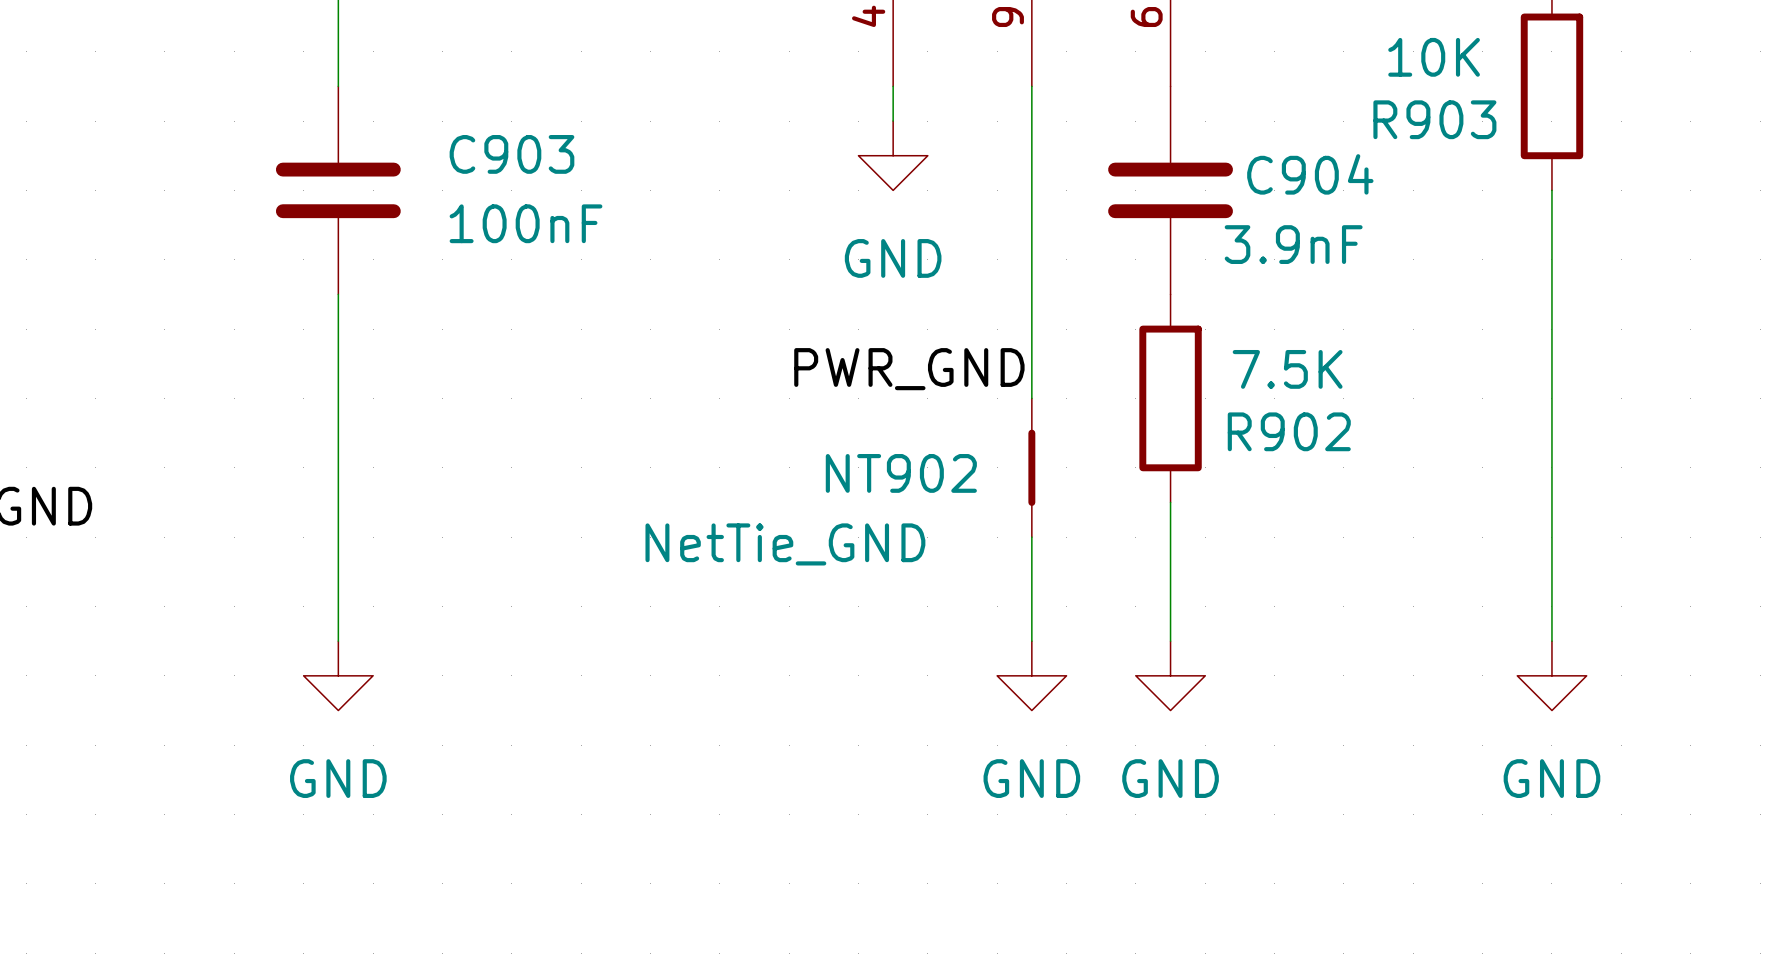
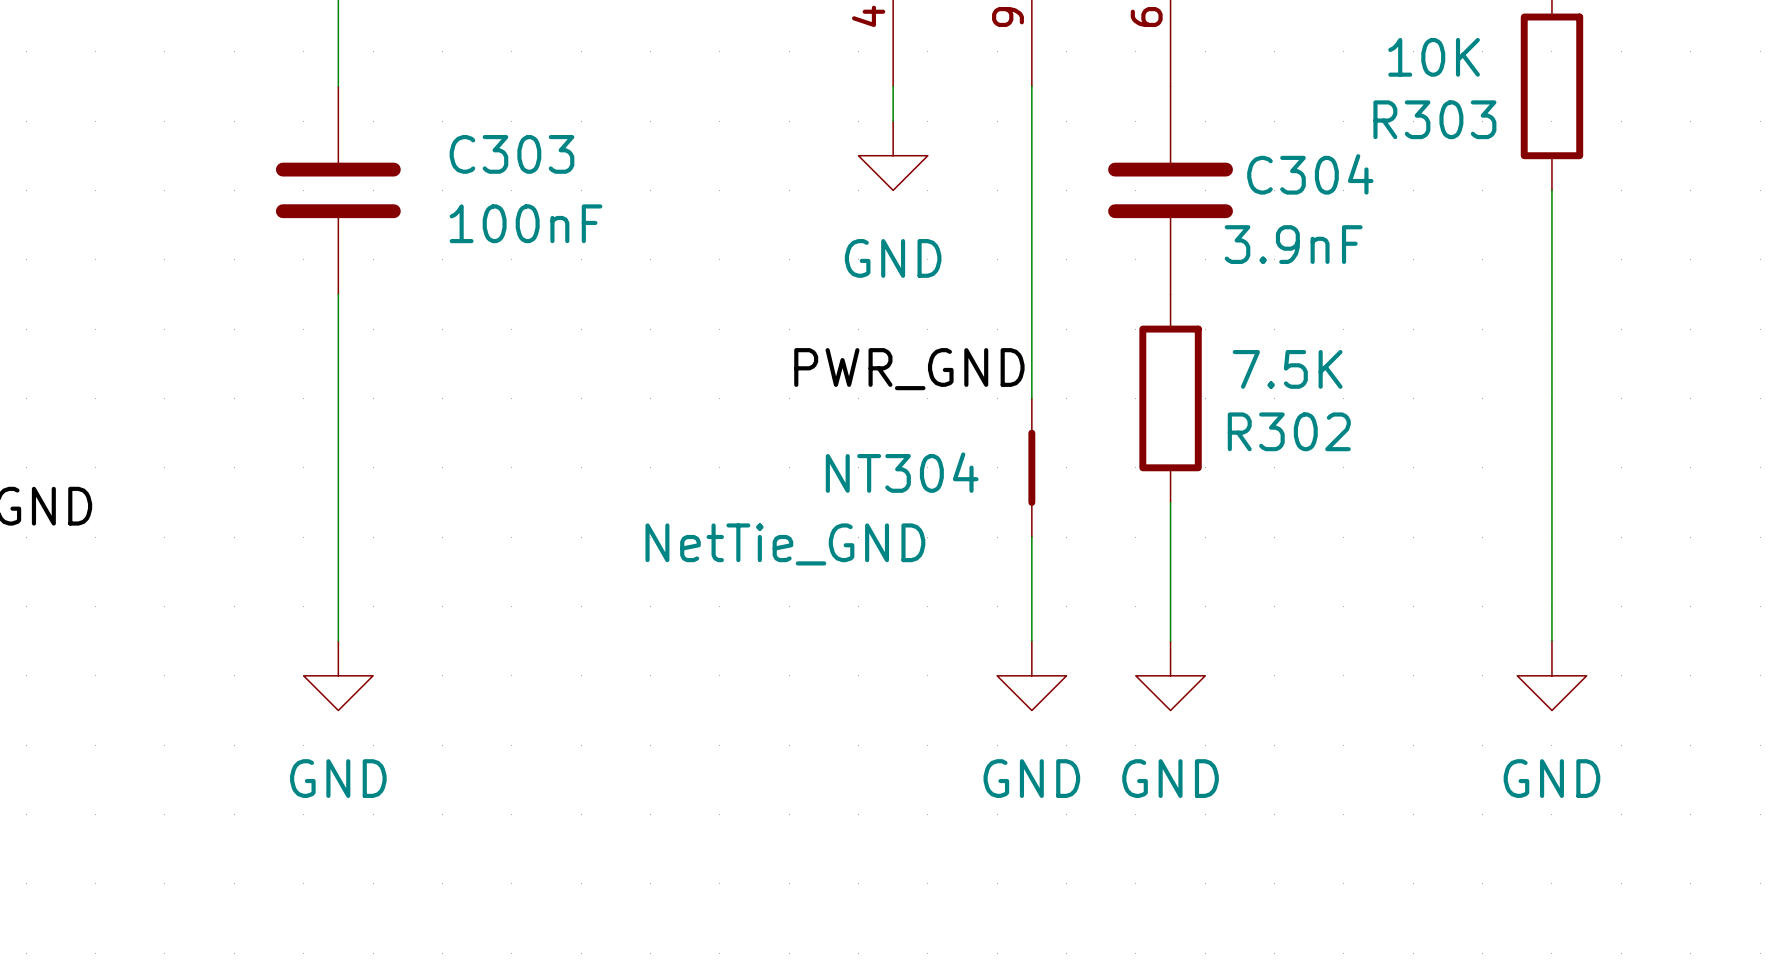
R903 name: R903 (1434, 119) -> R303 (1434, 119)
C903 name: C903 (511, 154) -> C303 (511, 154)
C904 name: C904 (1310, 174) -> C304 (1310, 174)
R902 name: R902 (1289, 431) -> R302 (1289, 431)
NT902 name: NT902 (901, 473) -> NT304 (902, 472)

